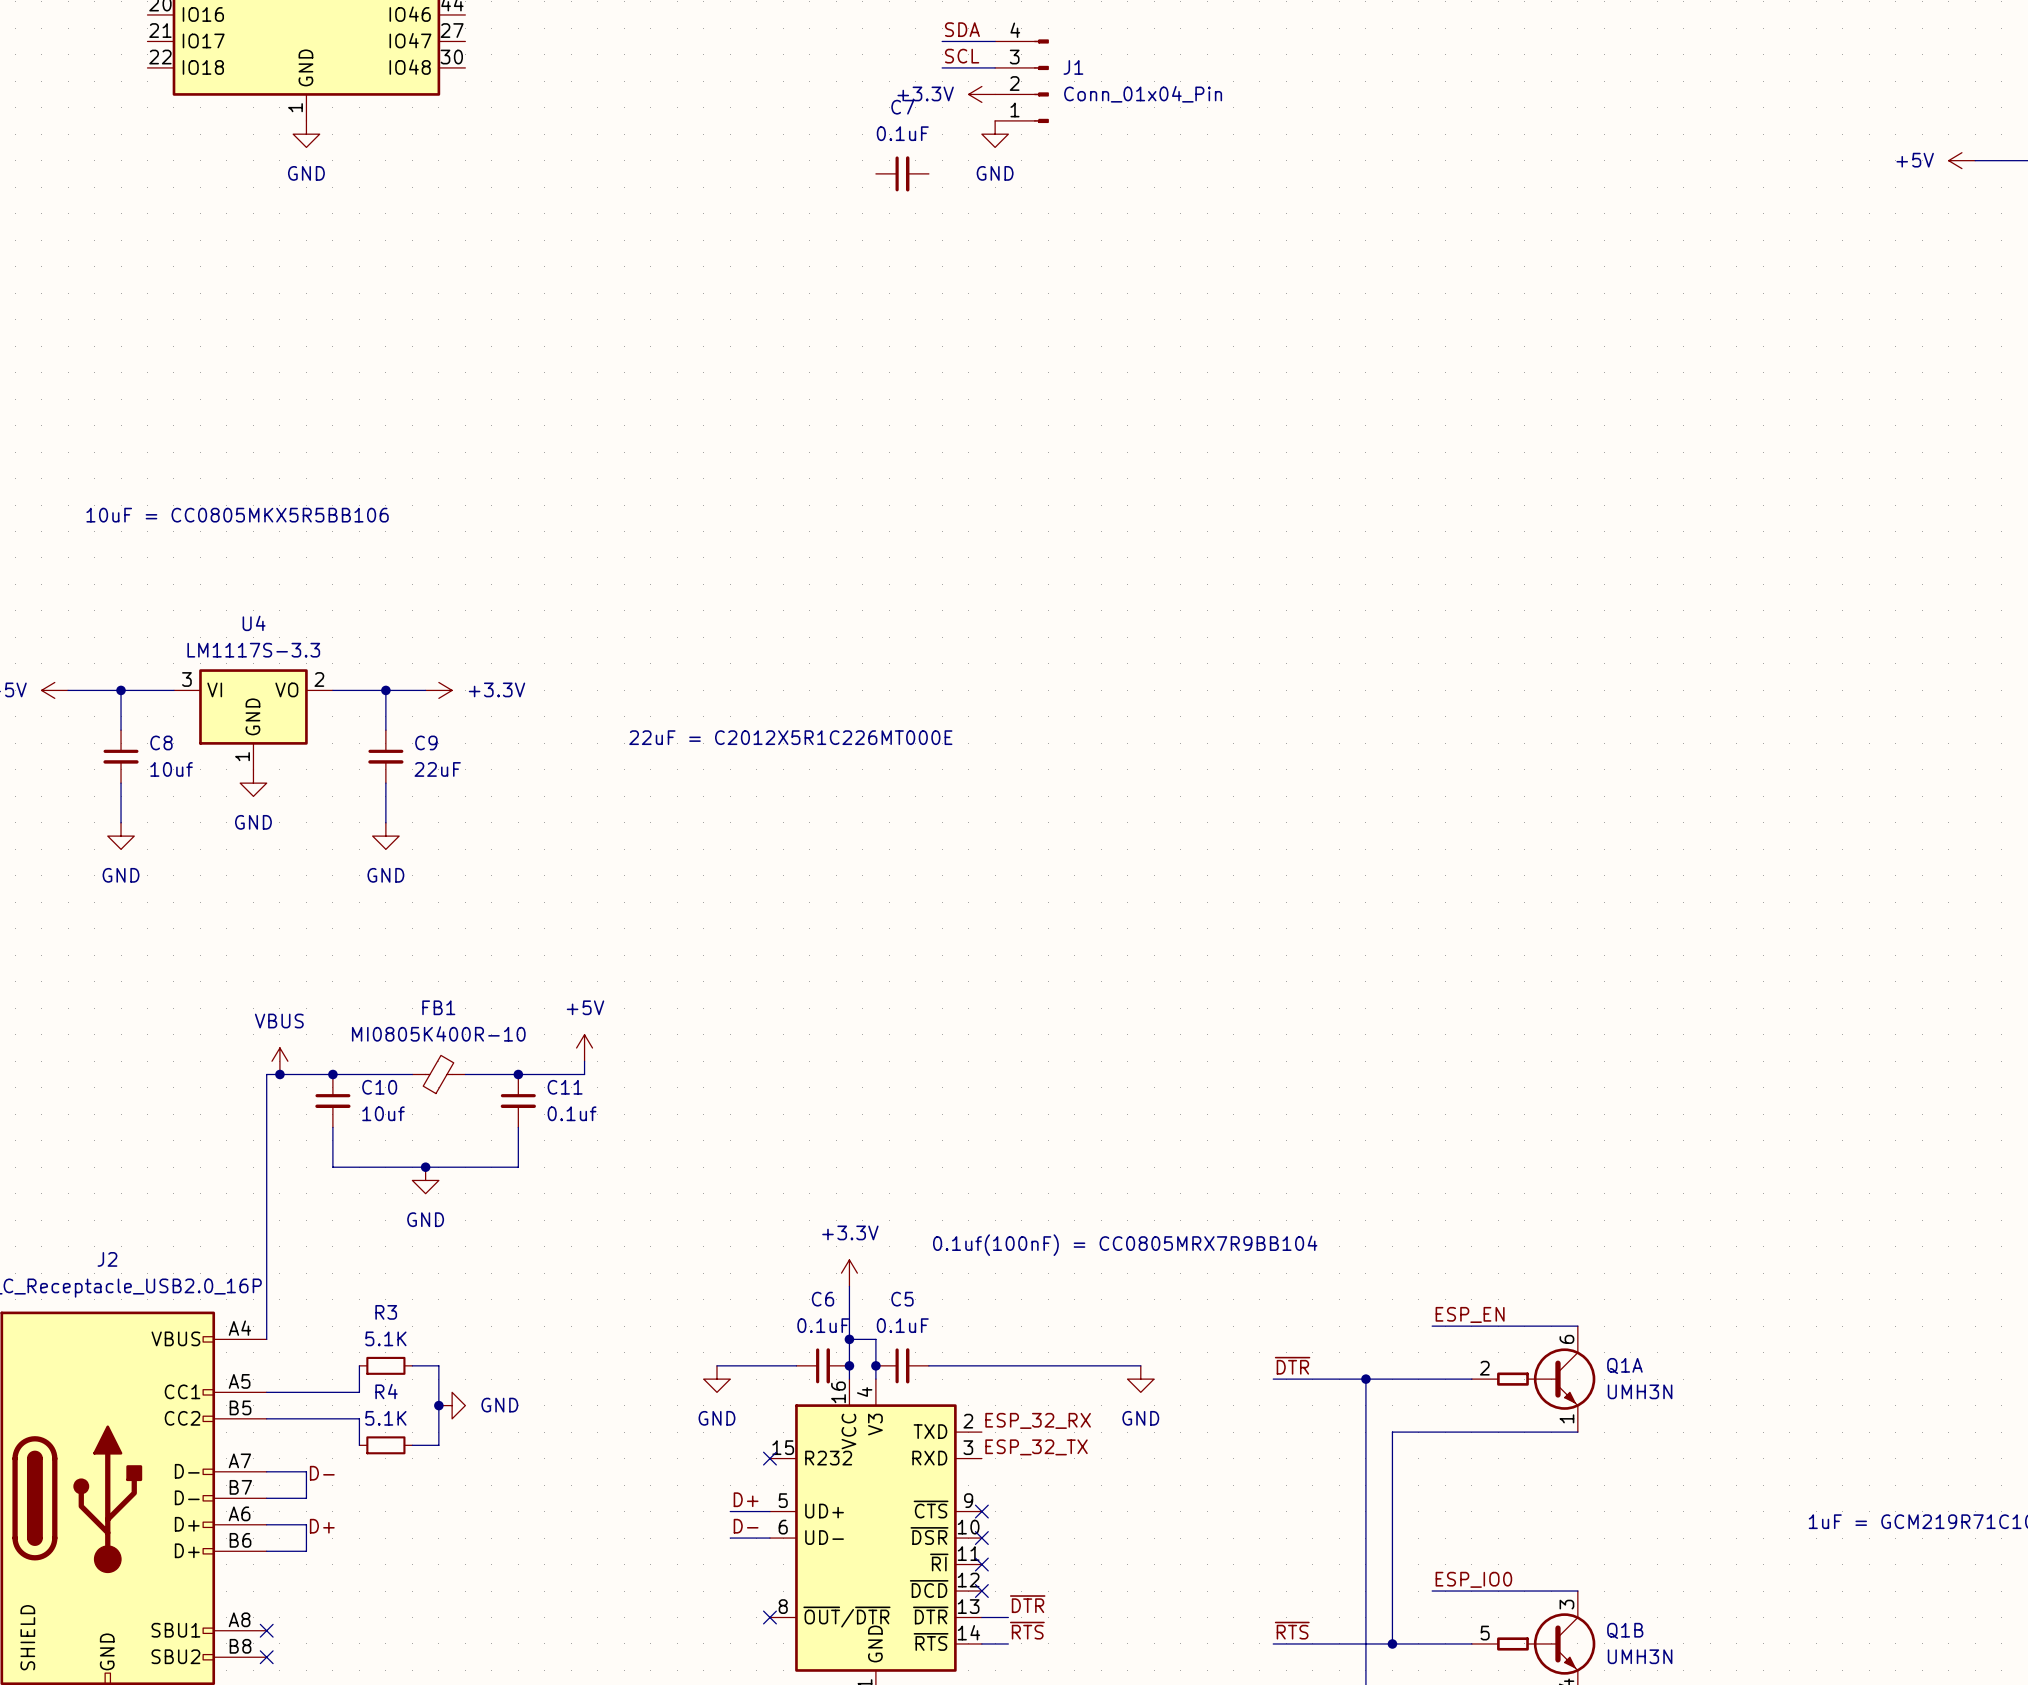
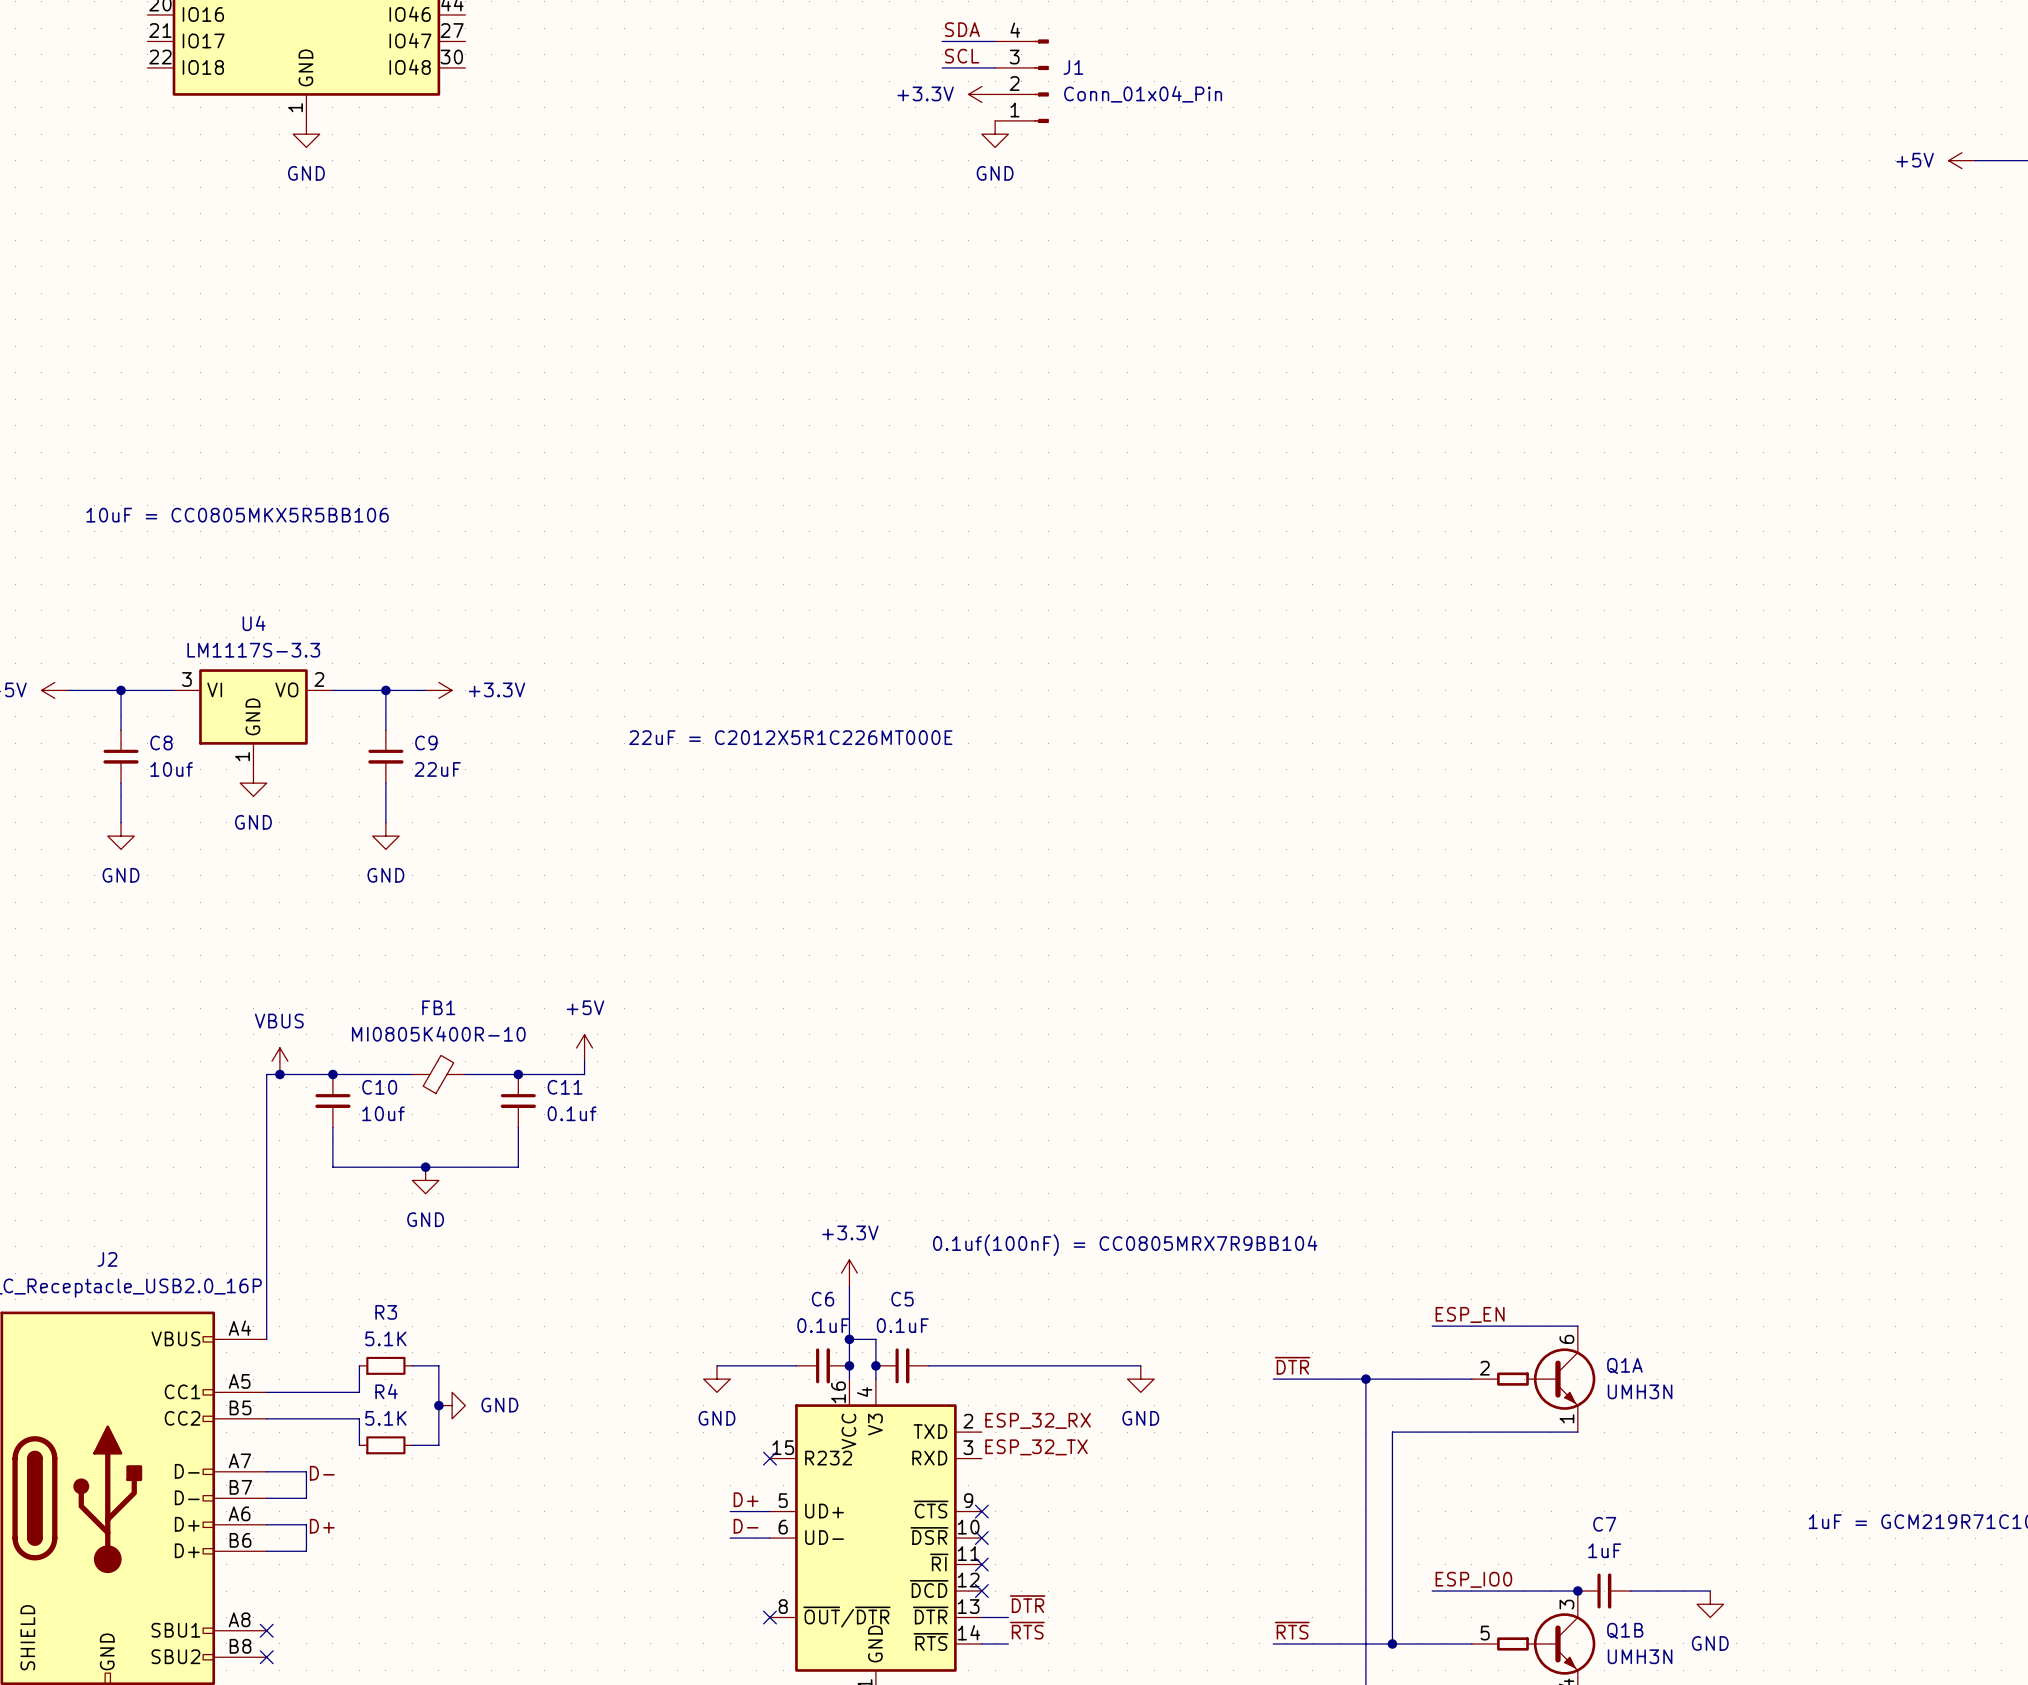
C7 value: 0.1uF (902, 133) -> 1uF (1604, 1550)
C7 position: (902, 173) -> (1604, 1591)
junction: none -> (1577, 1591)
wire: none -> (1630, 1591) (1710, 1591)
power symbol: none -> GND (1710, 1604)

